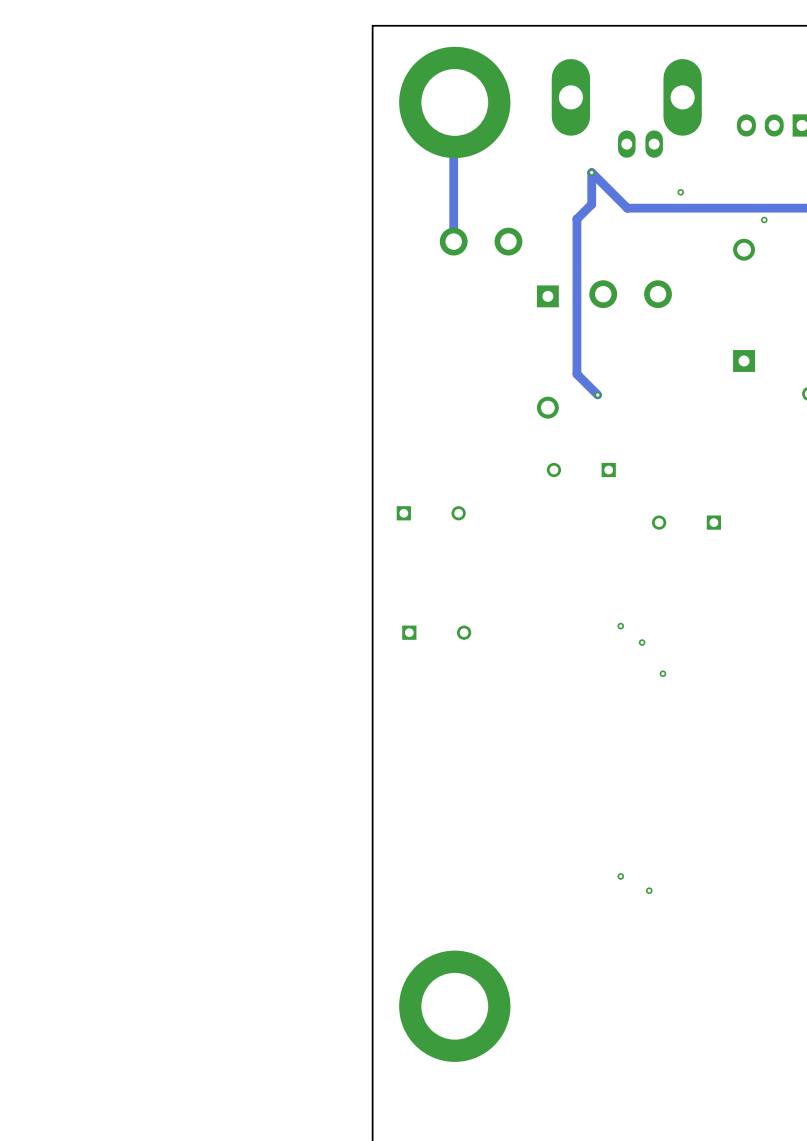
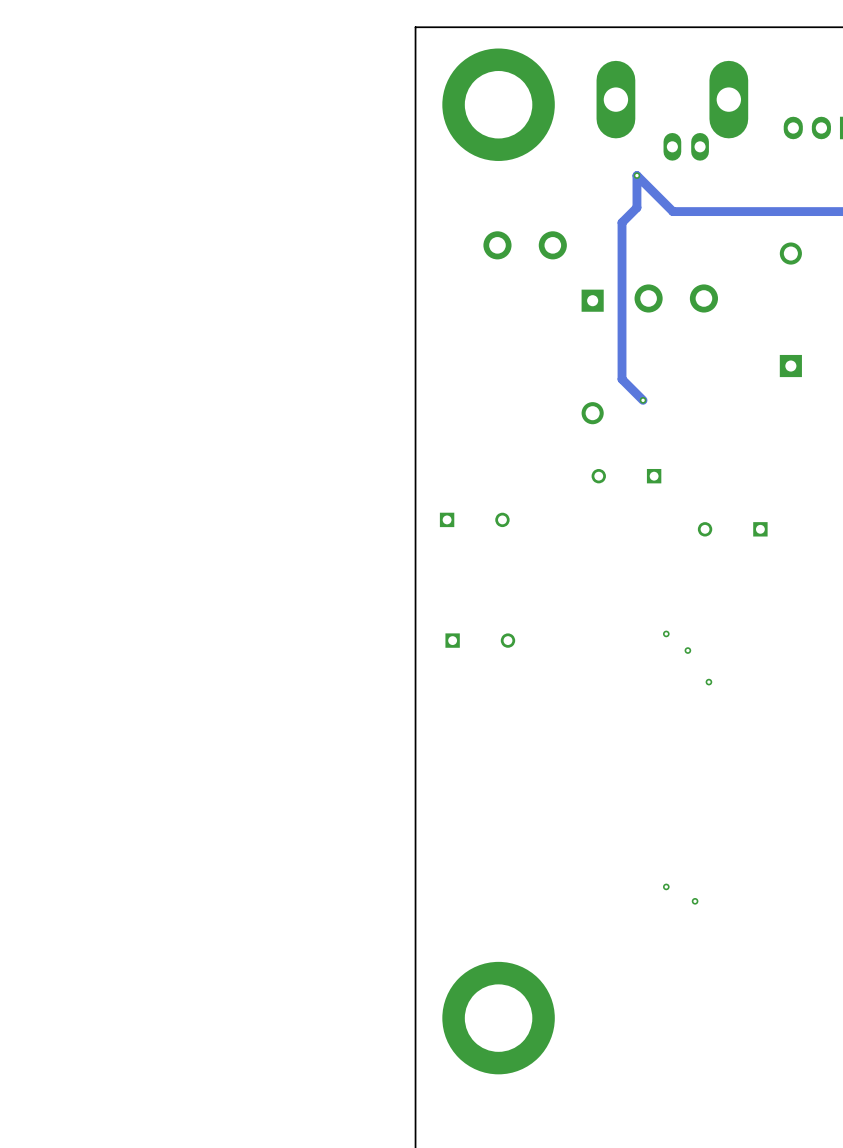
track: (454, 102) (453, 241) -> none
via: (680, 192) -> none
via: (764, 219) -> none

